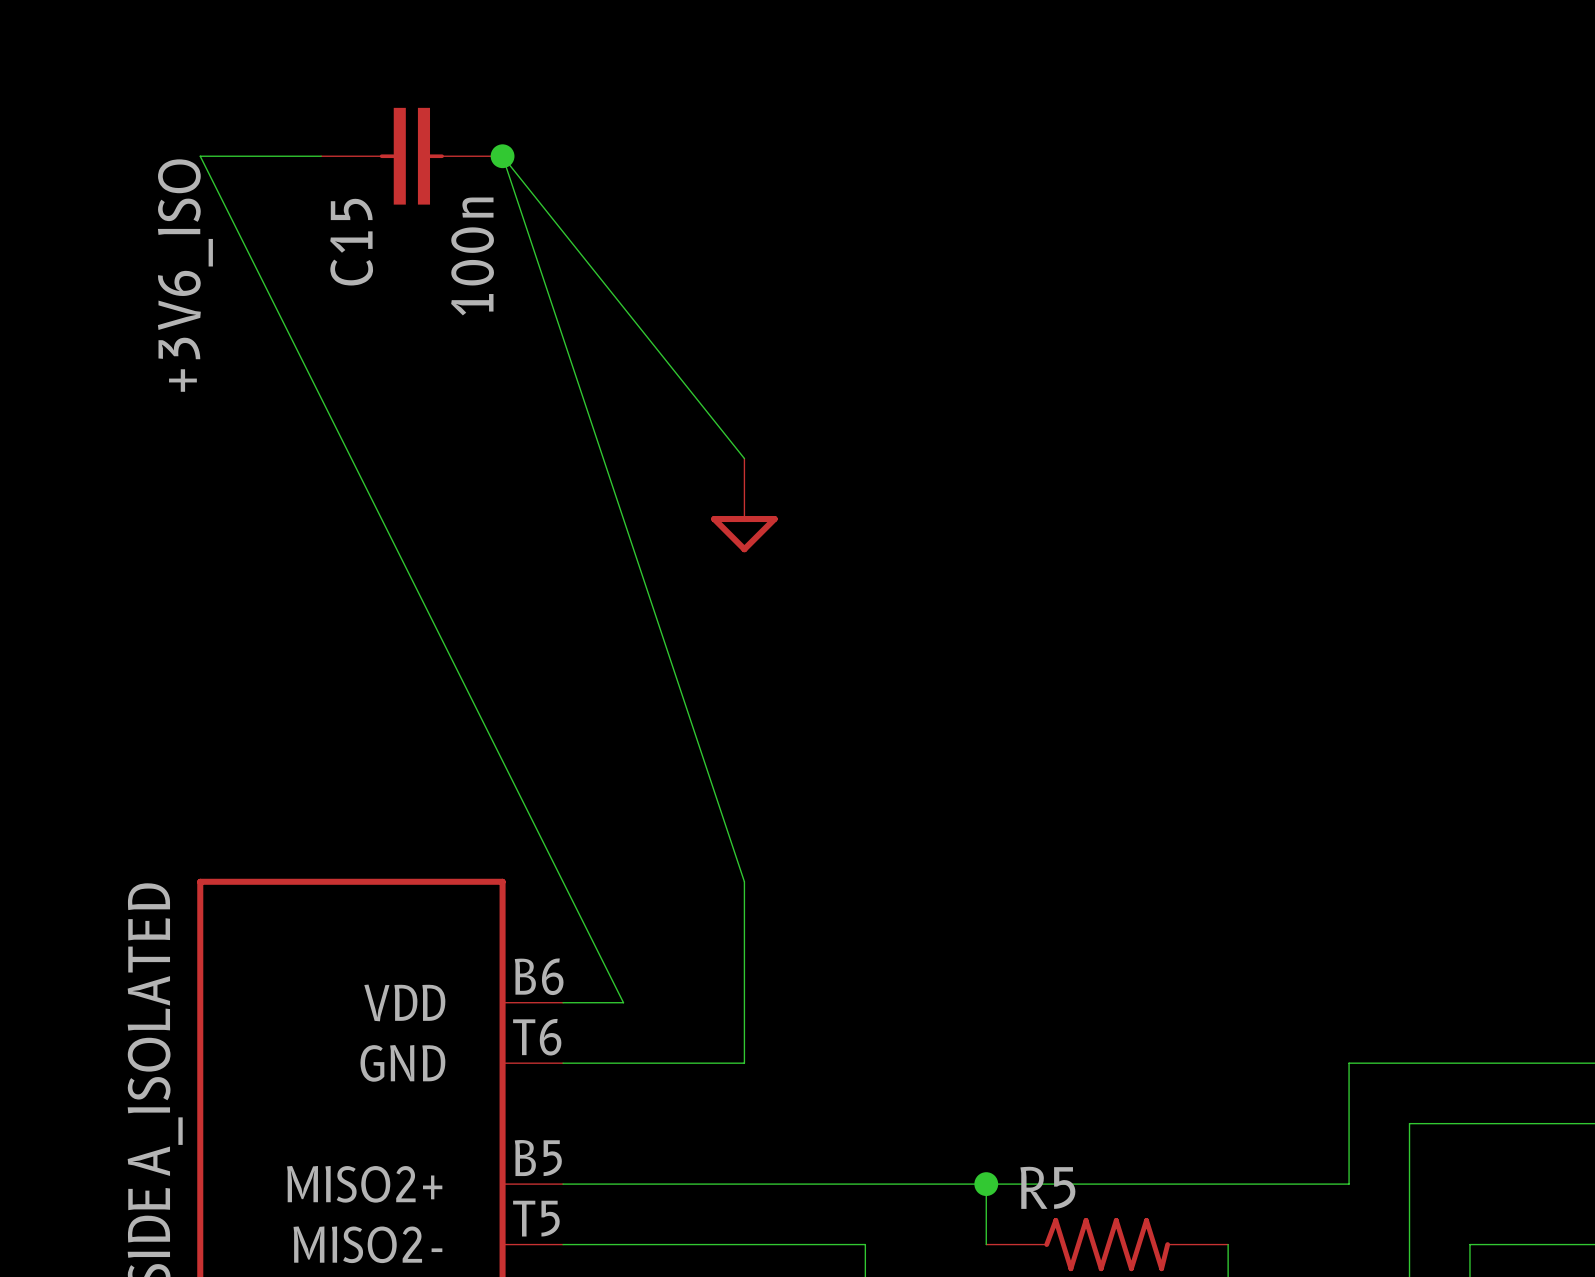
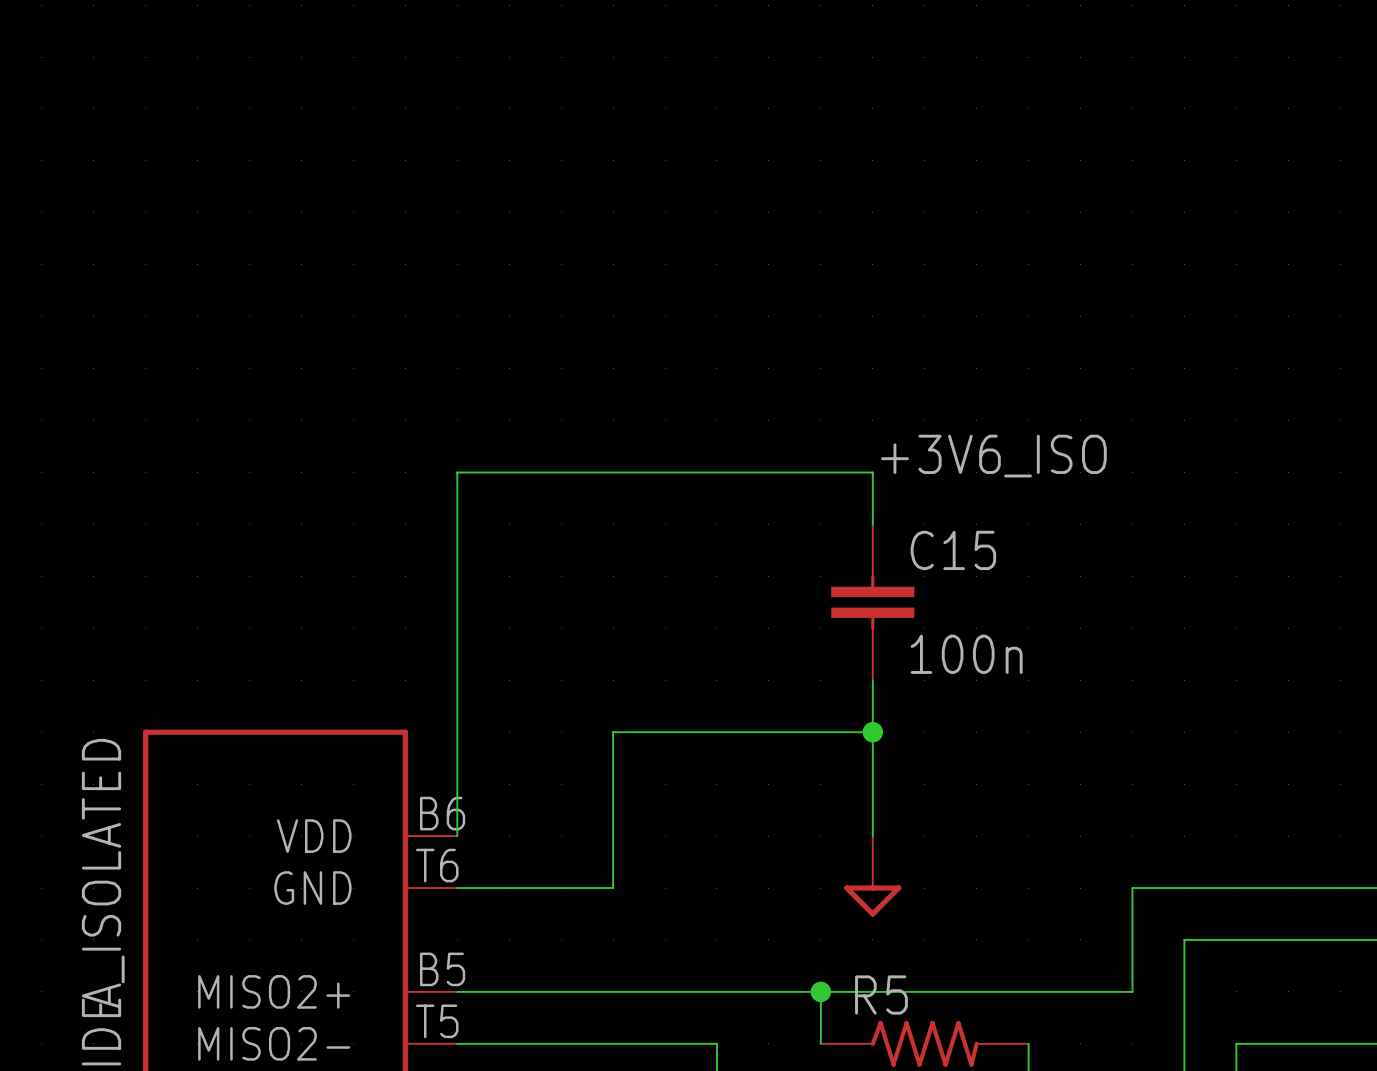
wire: (321, 156) (200, 156) (623, 1002) (563, 1002) -> (872, 524) (872, 472) (457, 472) (457, 836)
C15 rotation: 0° (411, 156) -> 90° clockwise (872, 602)
C15 position: (411, 156) -> (872, 602)
junction: (502, 156) -> none
C15 name position: C15 (351, 242) -> C15 (953, 550)
C15 value position: 100n (472, 256) -> 100n (966, 654)
label: +3V6_ISO (185, 275) -> none
wire: (744, 458) (502, 156) (744, 881) -> (872, 732) (613, 732)
power symbol: (744, 505) -> none
label: none -> +3V6_ISO (993, 456)
wire: none -> (872, 680) (872, 836)
junction: none -> (872, 732)
power symbol: none -> (872, 876)

